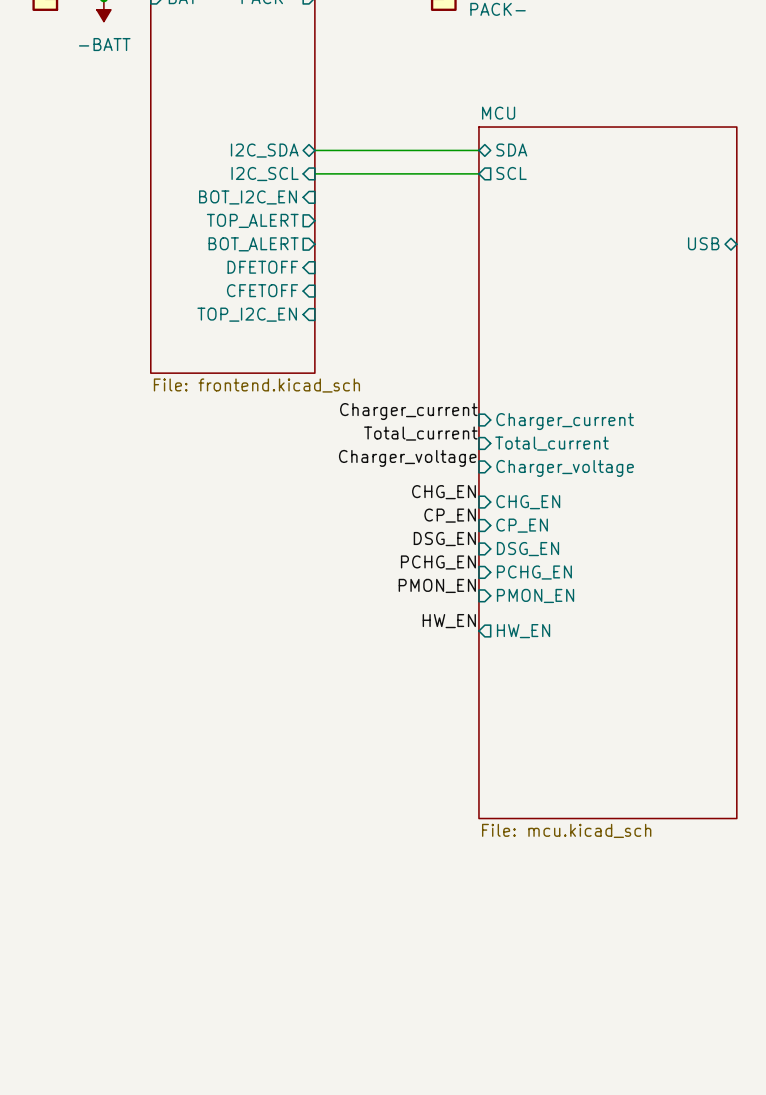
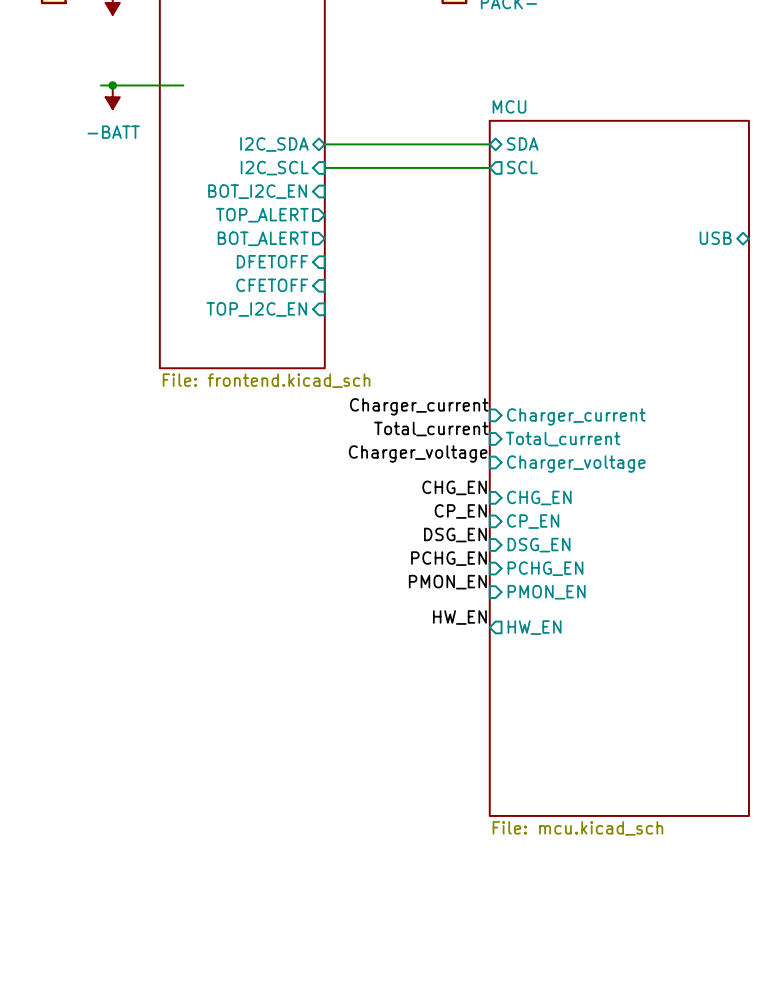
power symbol text: -BATT (104, 44) -> none
wire: none -> (100, 85) (183, 85)
junction: none -> (112, 85)
power symbol: none -> -BATT (112, 97)

